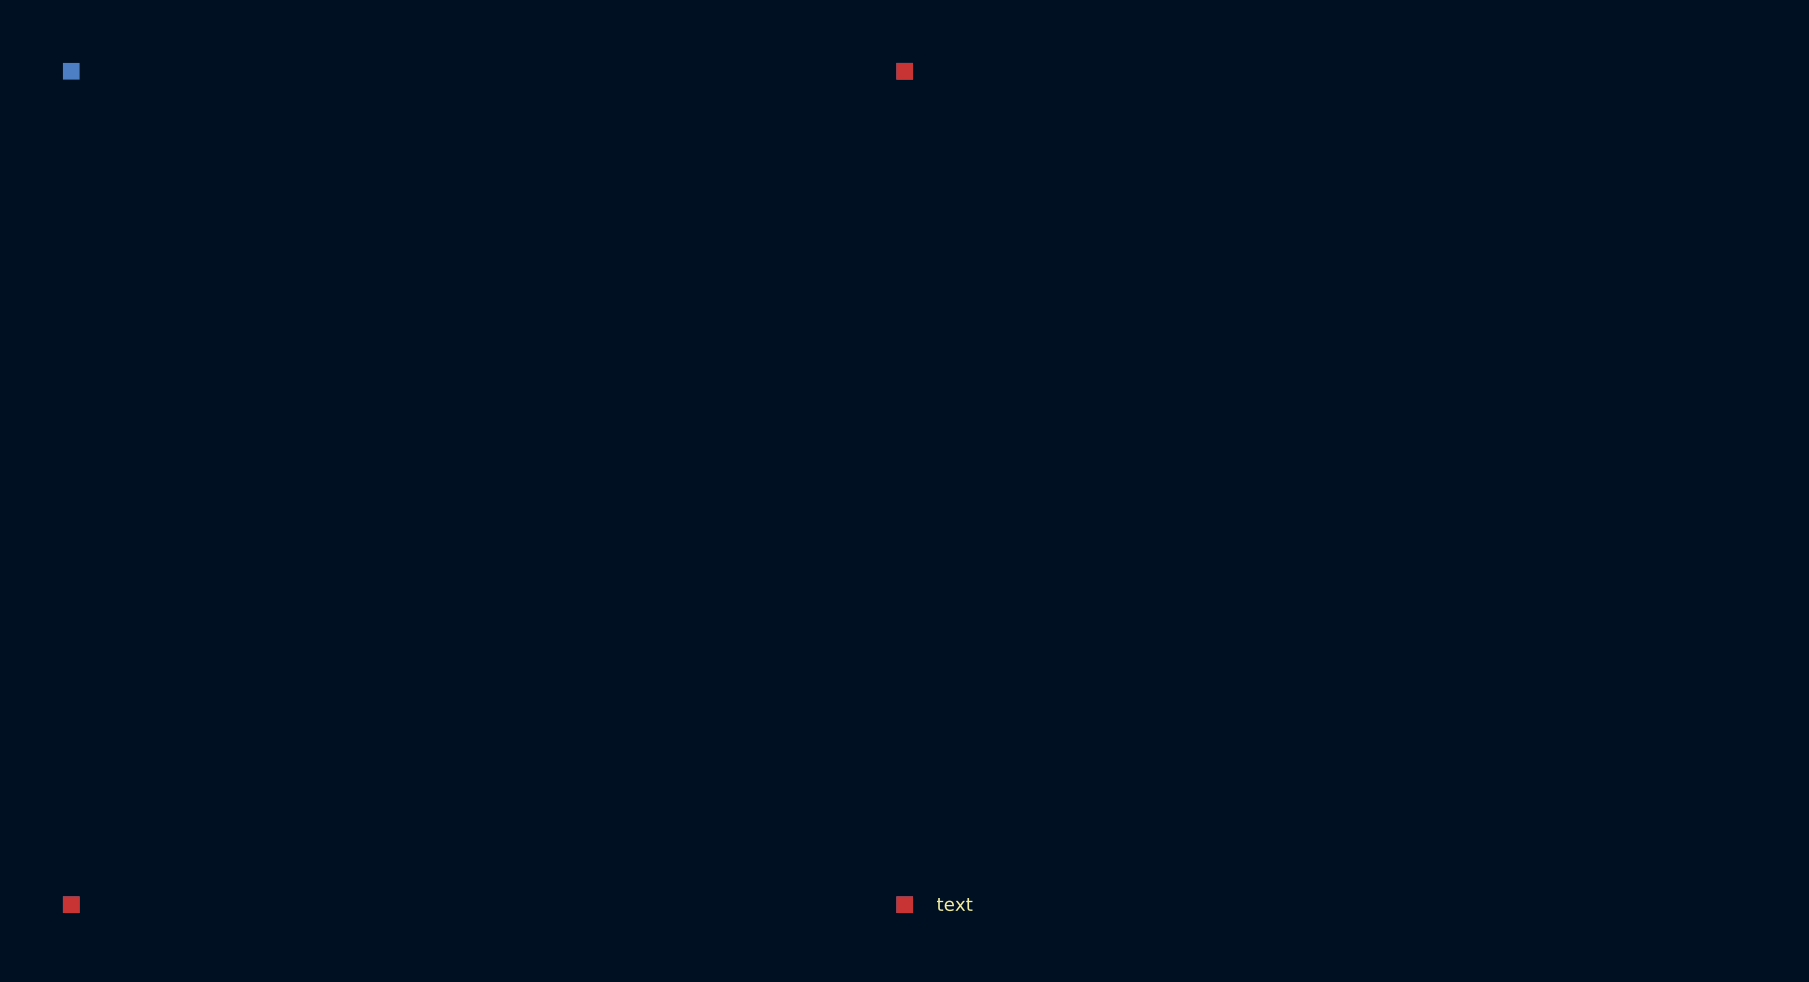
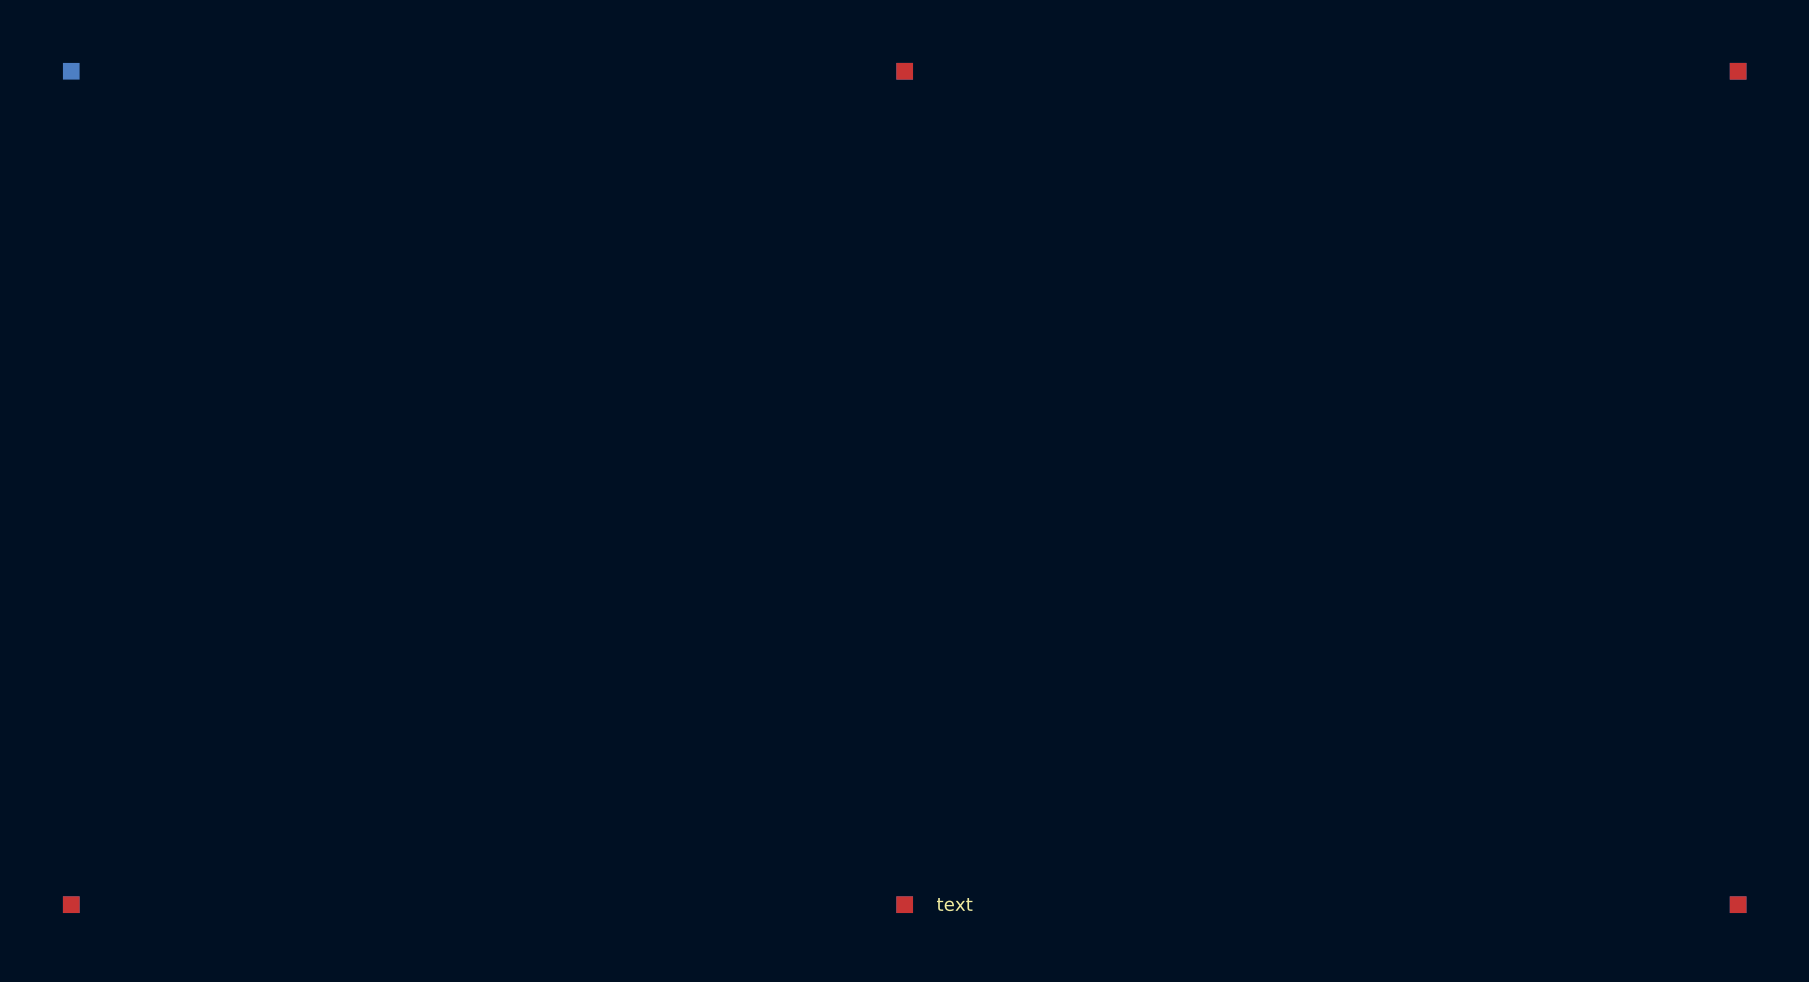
part: none -> (1738, 71)
part: none -> (1738, 904)

